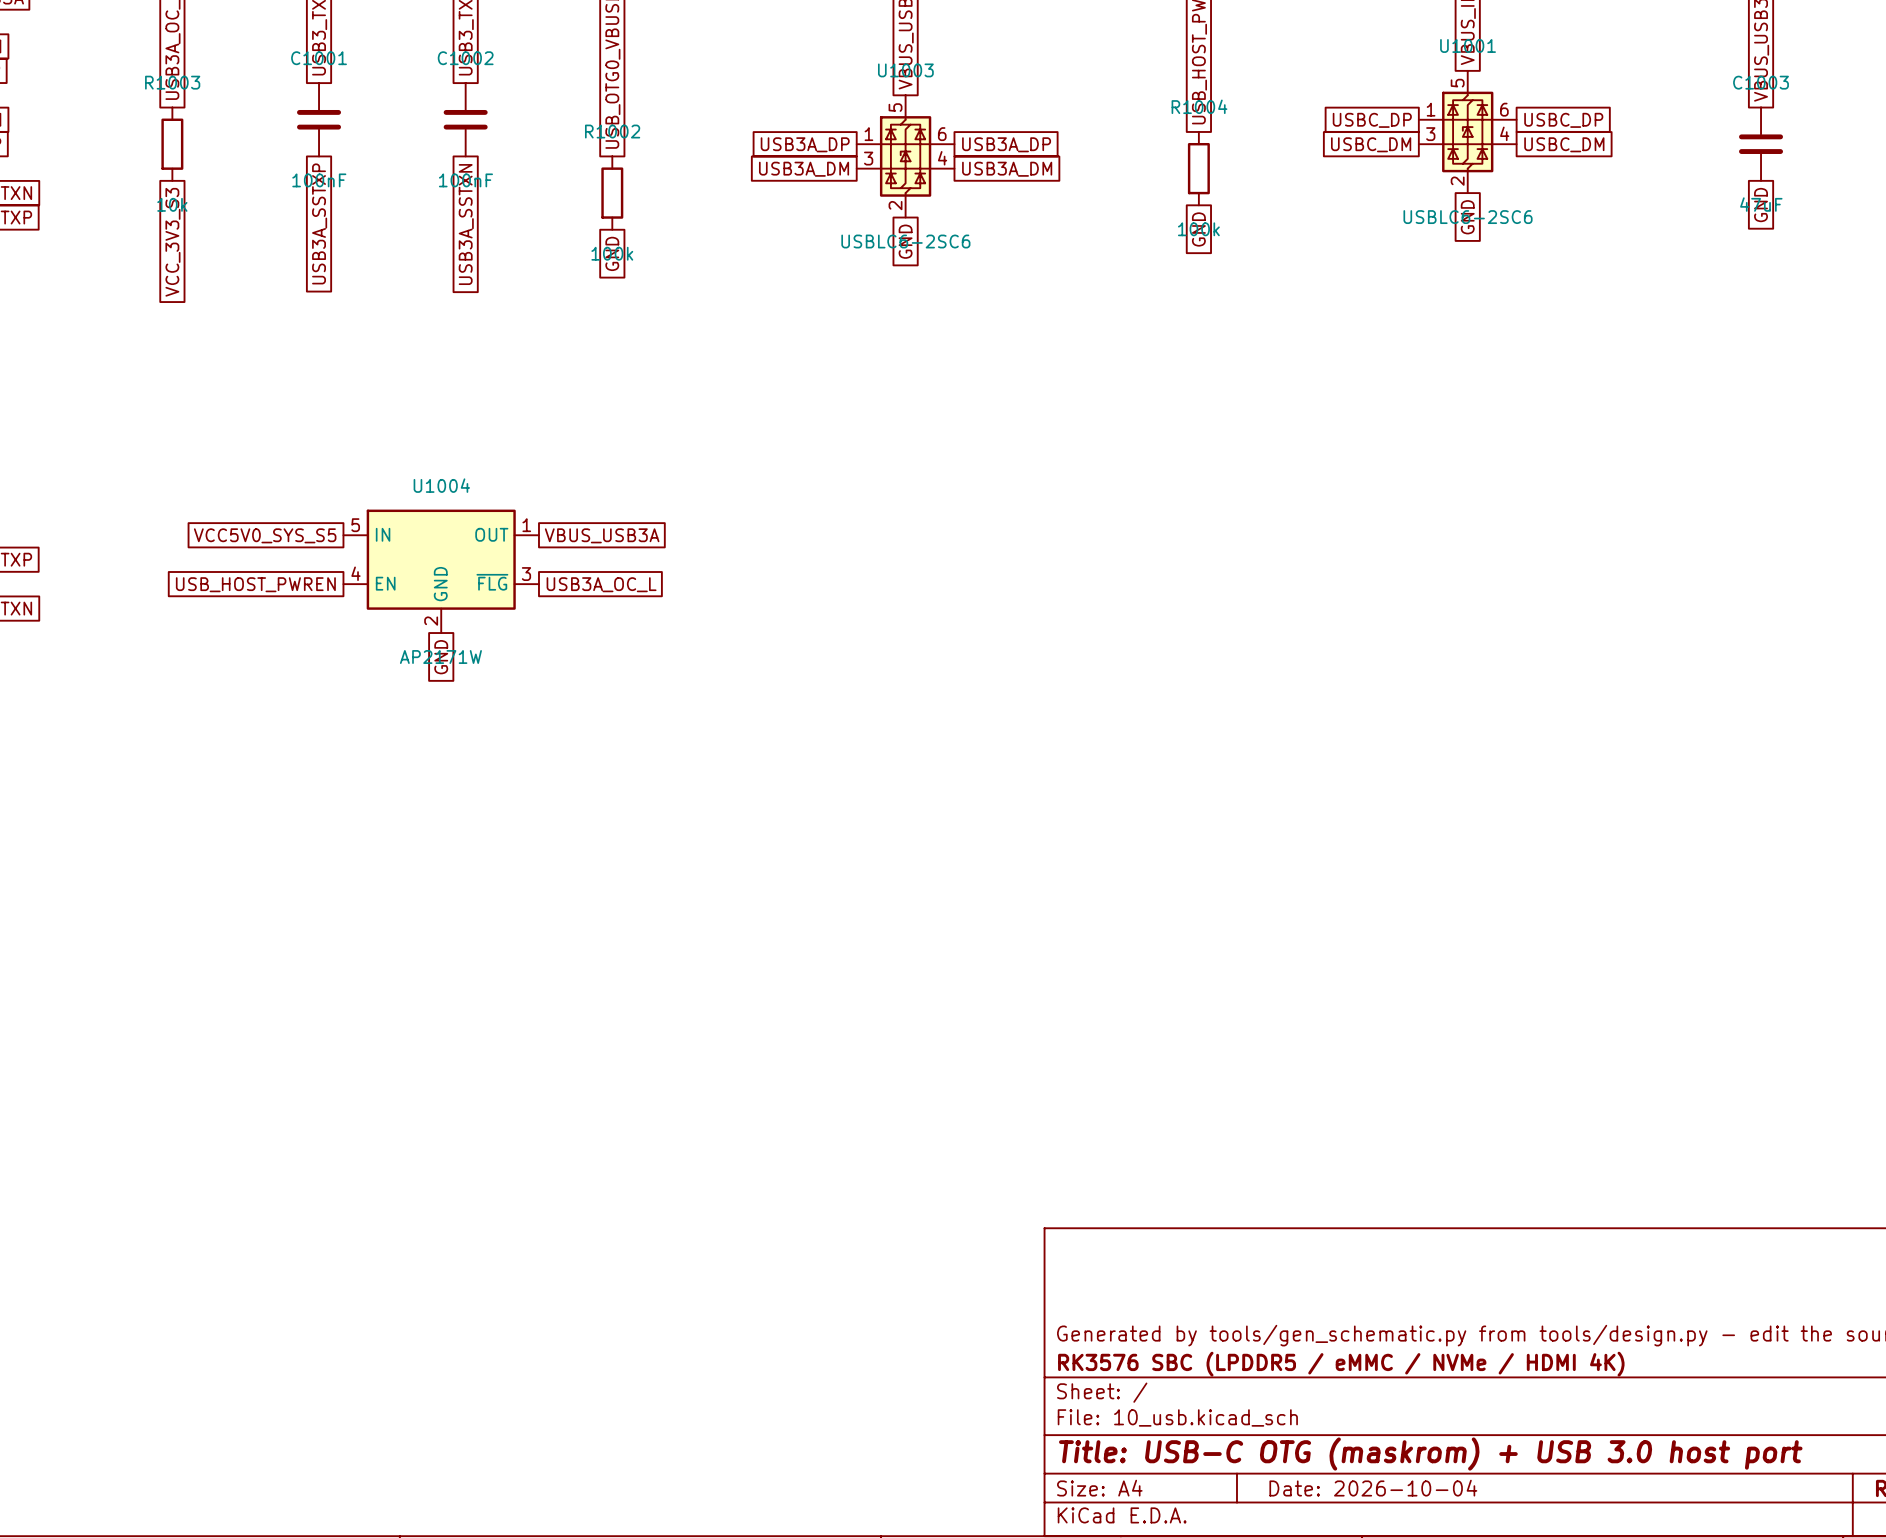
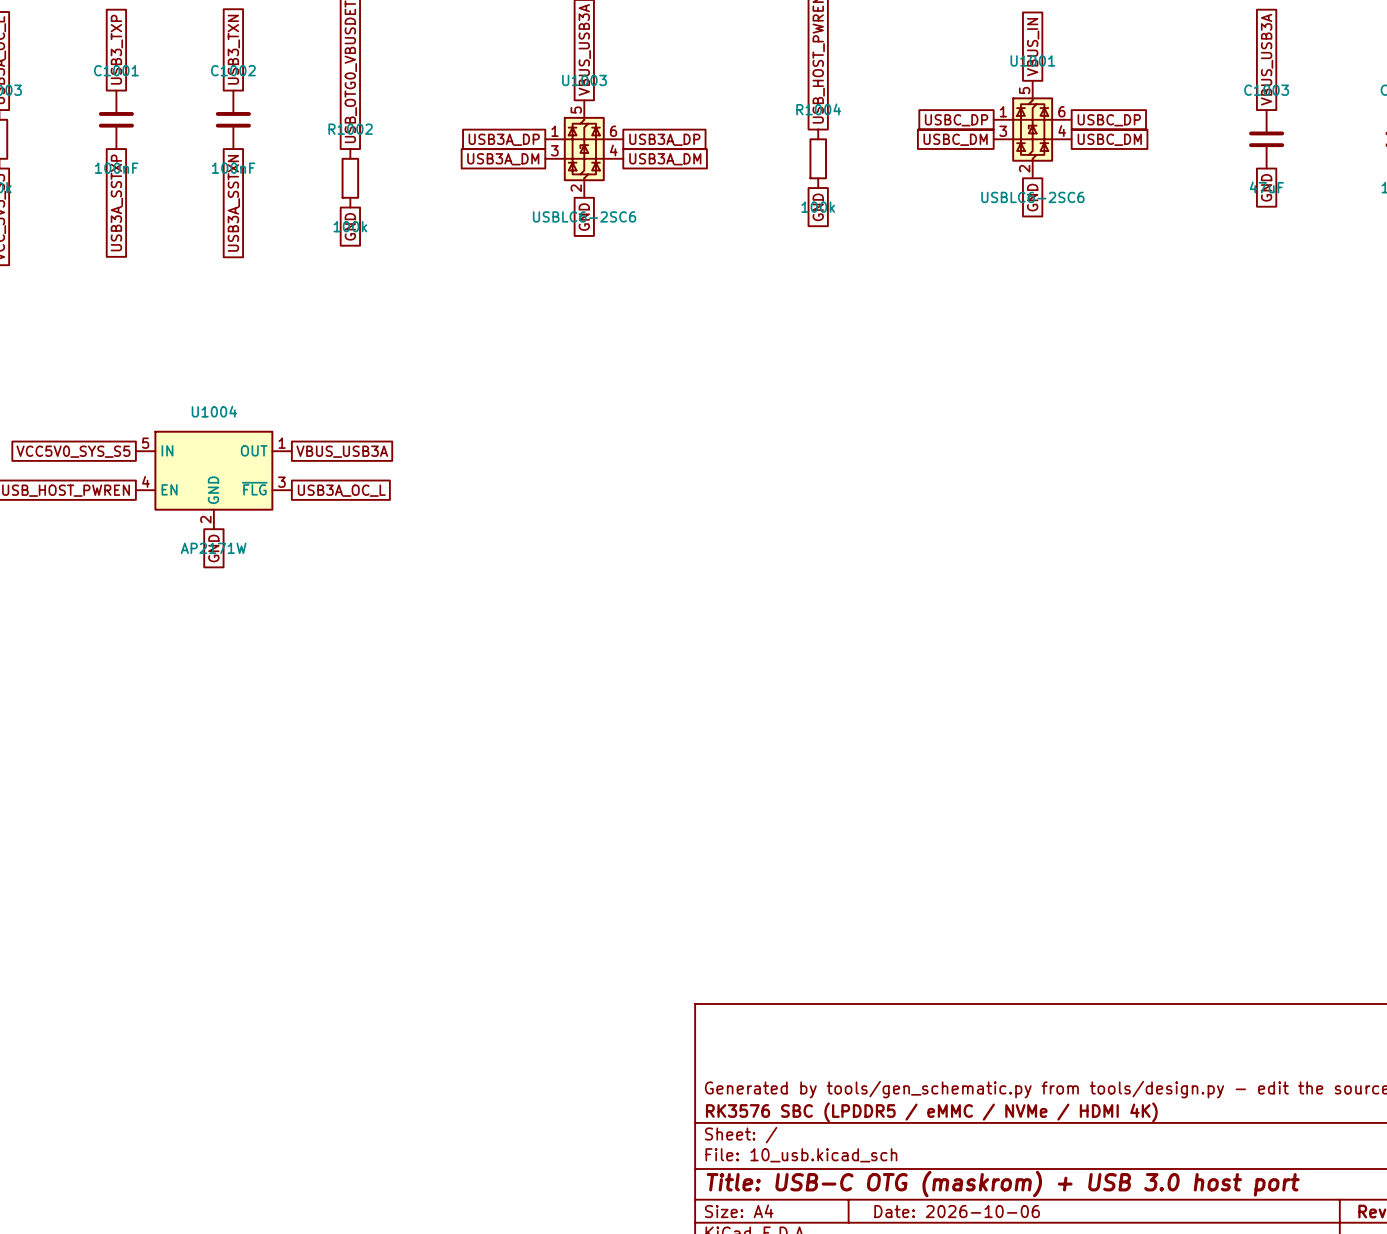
title block: Date: 2026-10-04 (1373, 1488) -> Date: 2026-10-06 (957, 1211)

